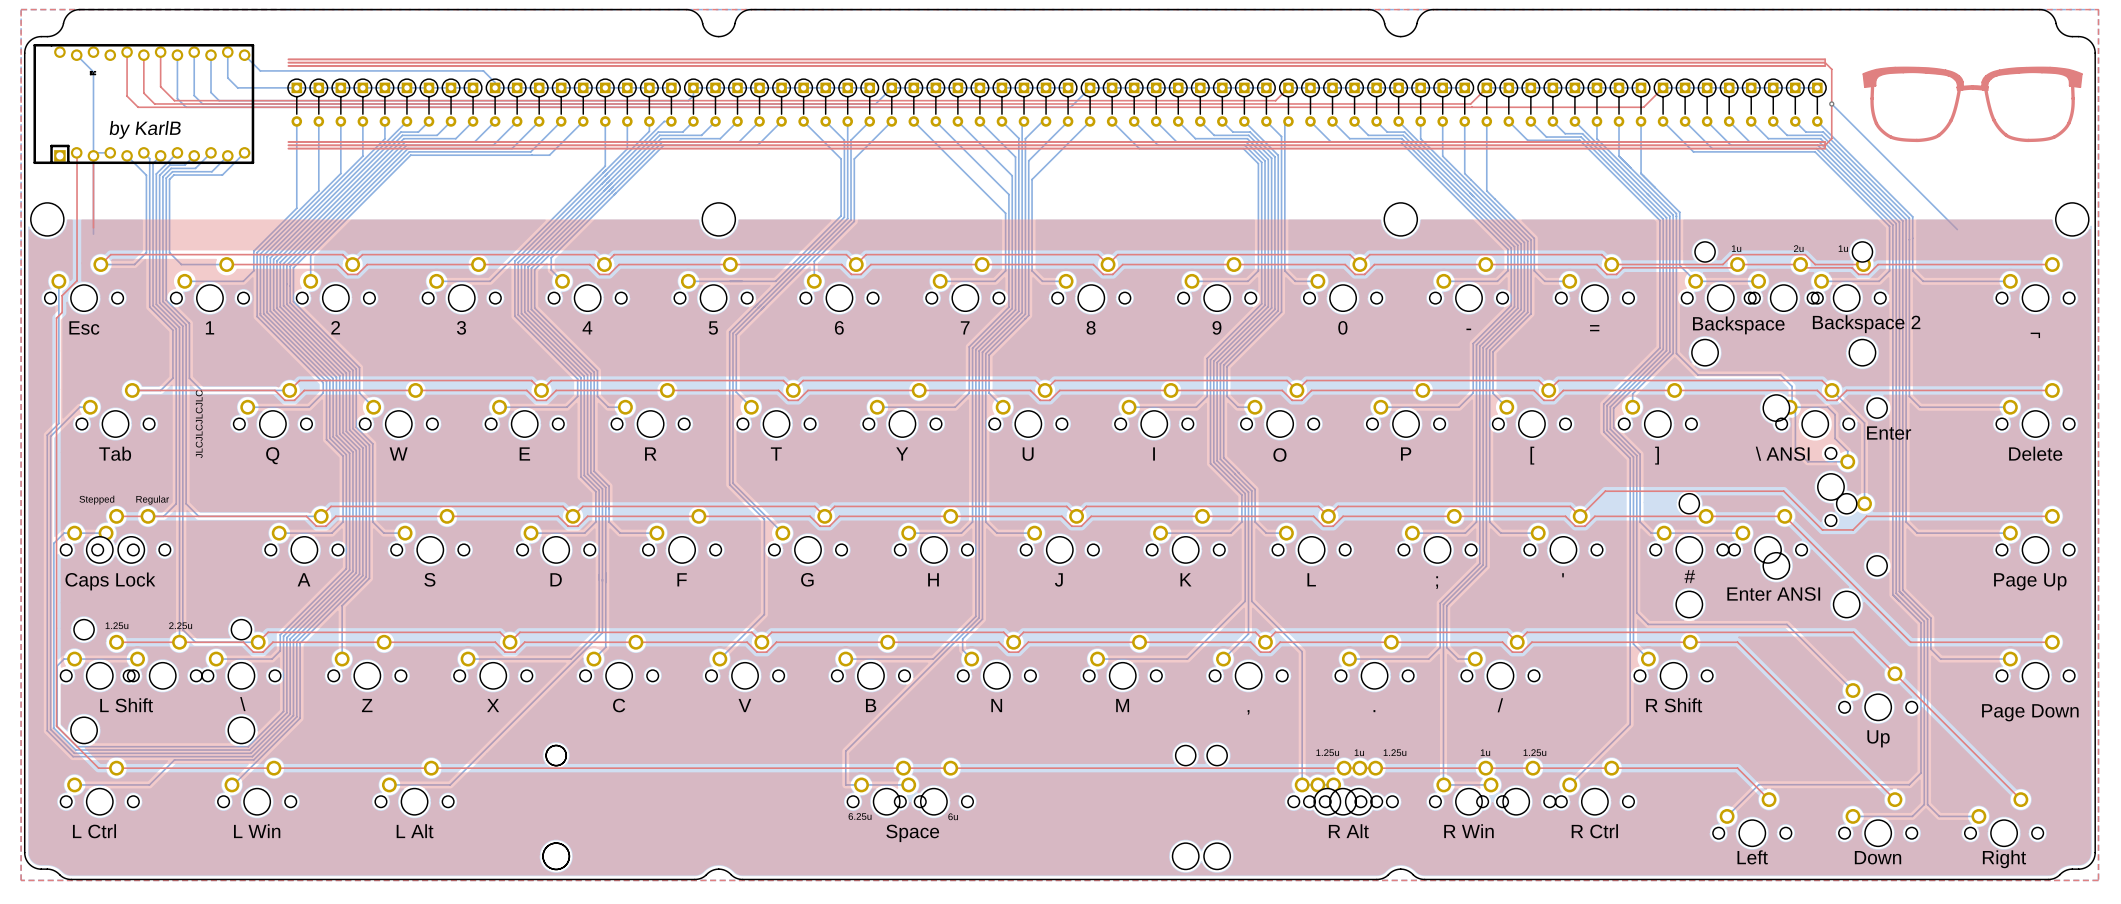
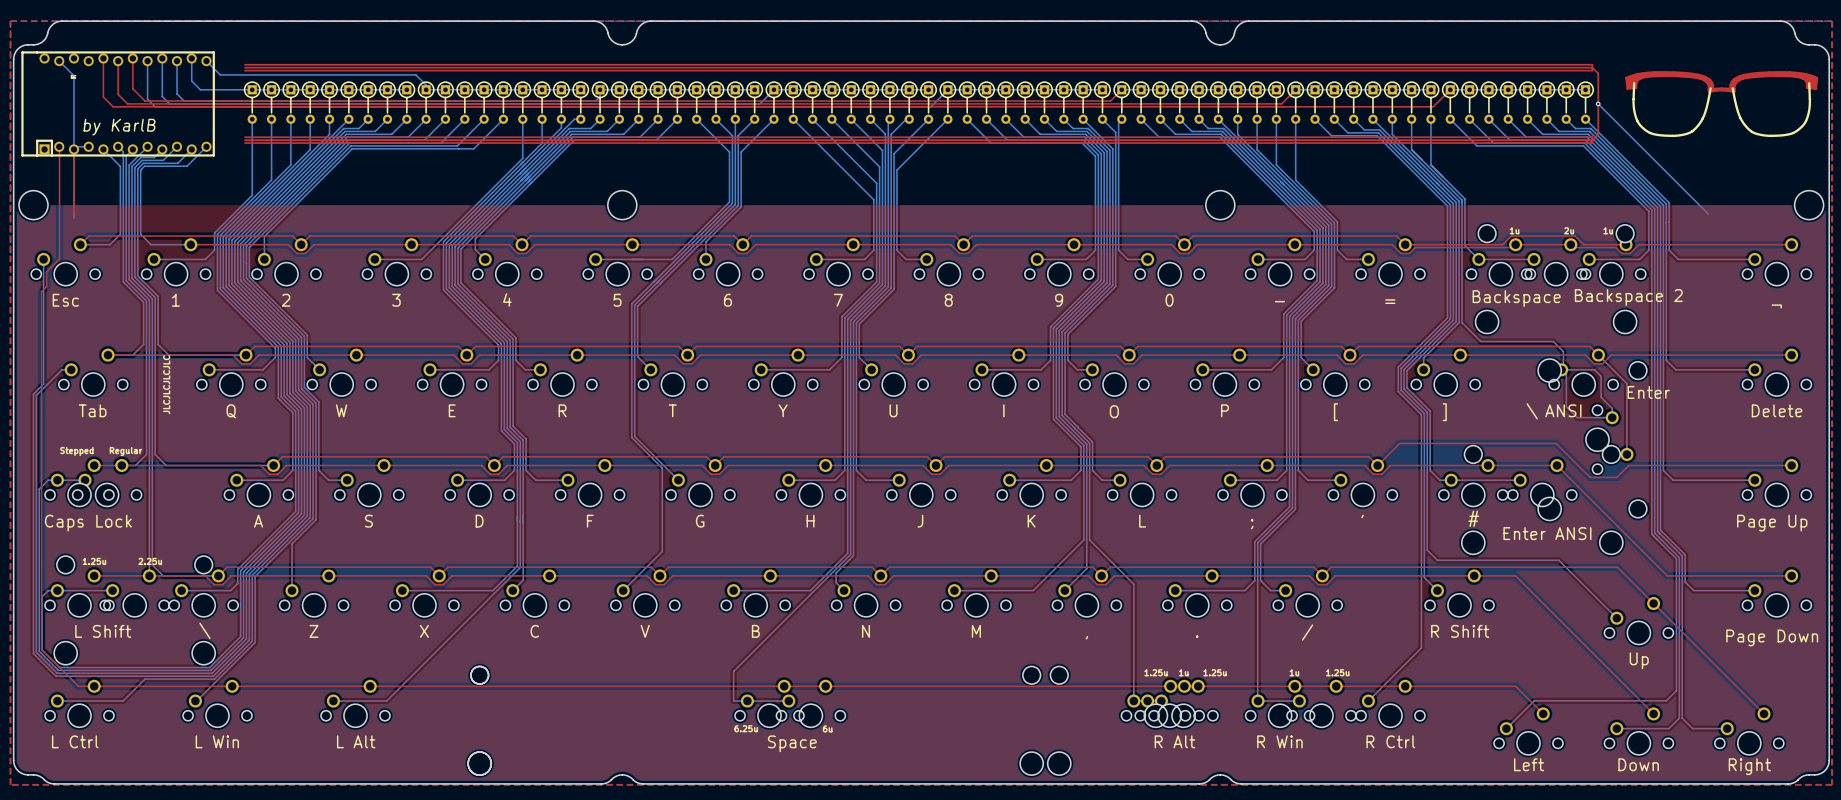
top track: (1872, 80) (1872, 106) (1877, 124) (1889, 136) (1906, 140) (1929, 138) (1942, 132) (1952, 116) (1960, 86) -> none
line: none -> (1634, 83) (1633, 106) (1637, 121) (1648, 132) (1663, 135) (1684, 134) (1695, 128) (1704, 114) (1710, 88)
top track: (2072, 80) (2072, 106) (2068, 124) (2055, 136) (2039, 140) (2015, 138) (2002, 132) (1992, 116) (1985, 86) -> none
line: none -> (1809, 83) (1809, 106) (1805, 121) (1794, 132) (1780, 135) (1759, 134) (1748, 128) (1738, 114) (1732, 88)

